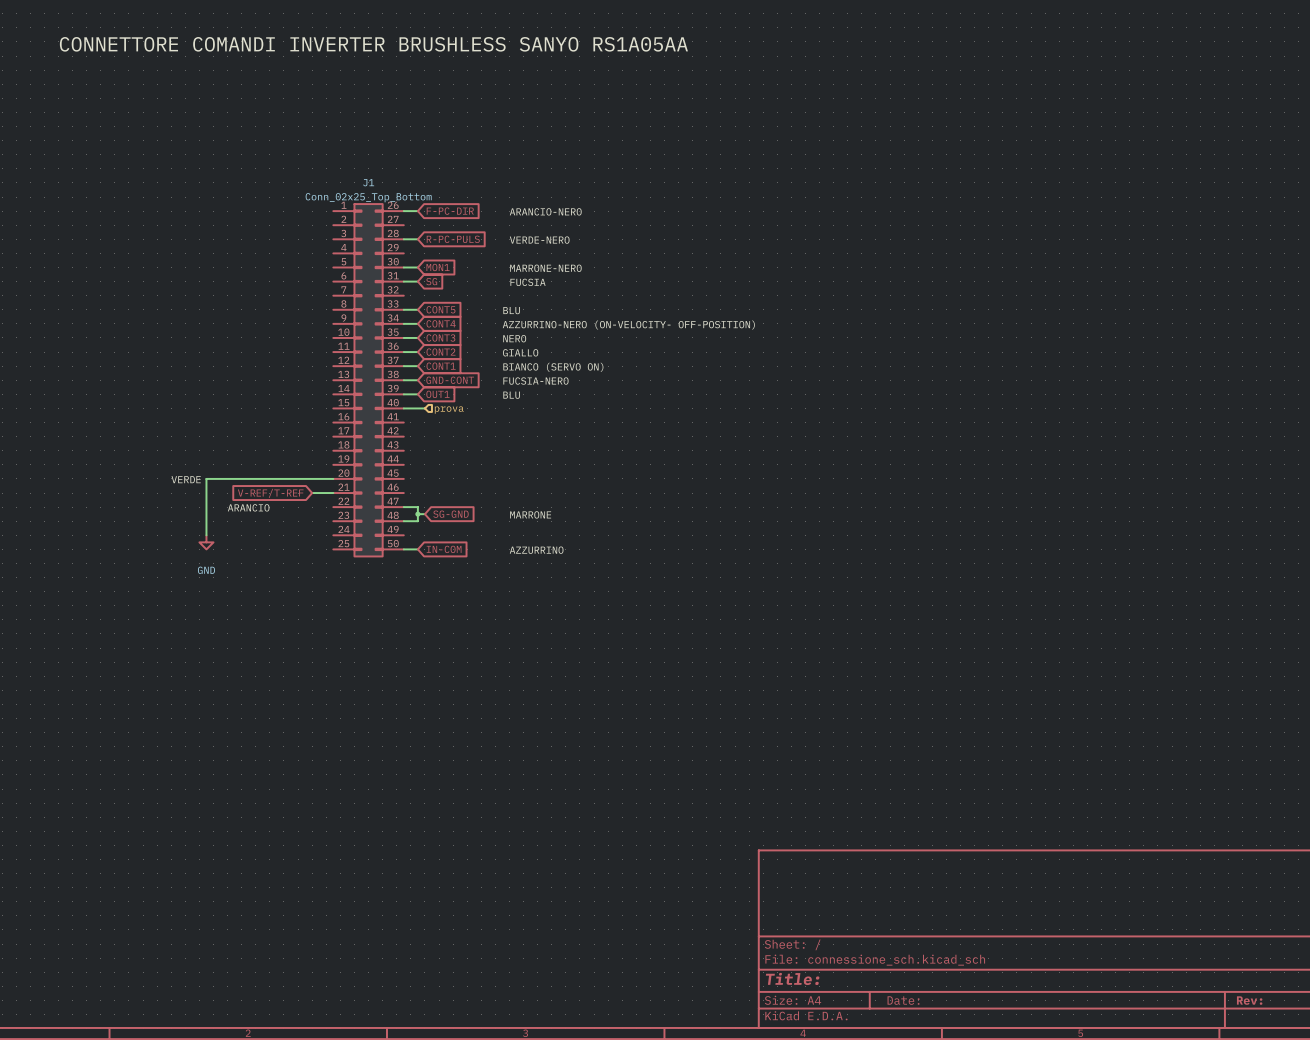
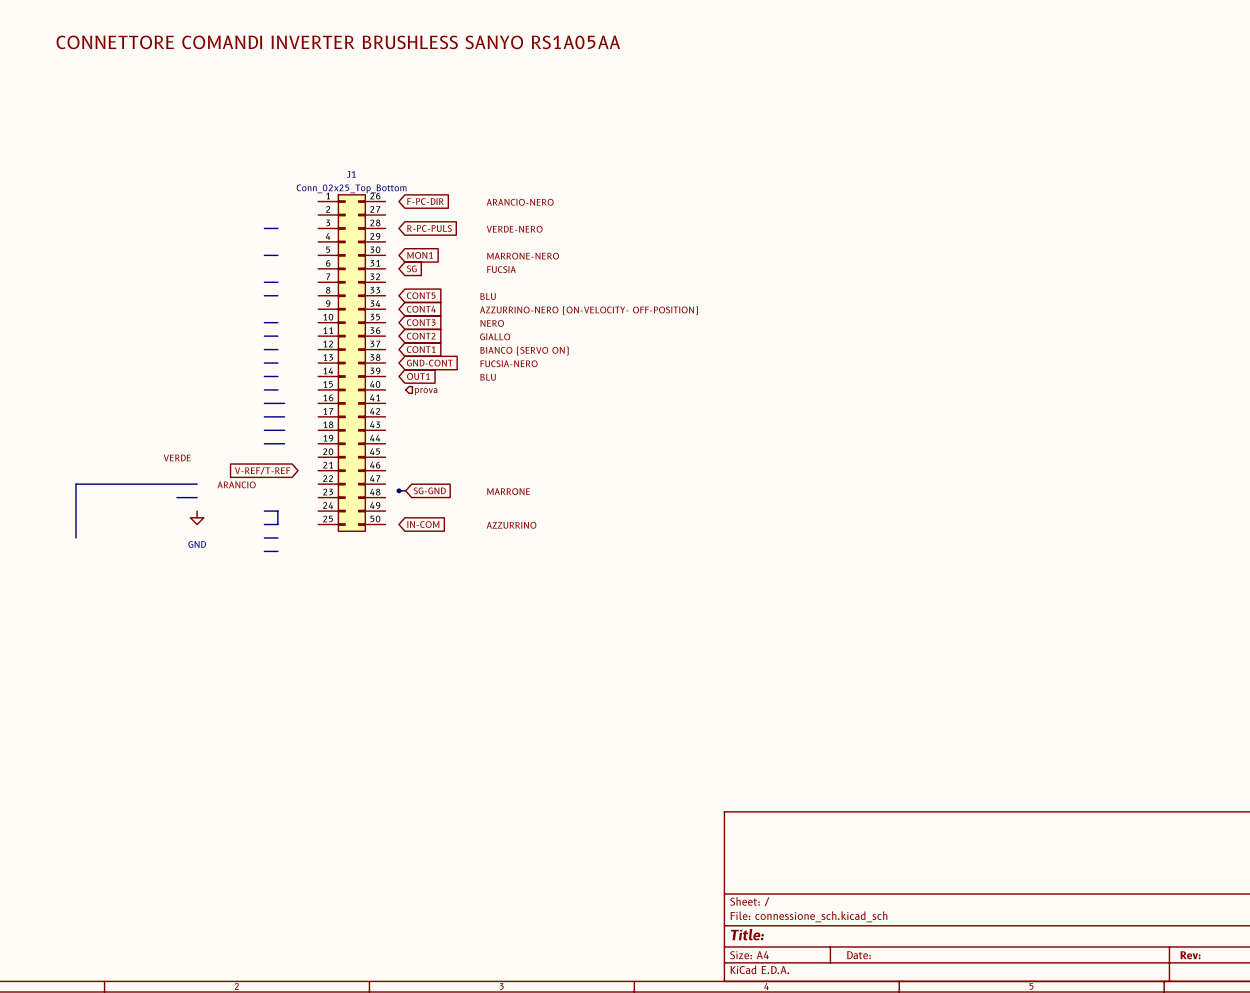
wire: (403, 211) (417, 211) -> (264, 228) (277, 228)
wire: (403, 239) (417, 239) -> (264, 255) (277, 255)
wire: (403, 267) (417, 267) -> (264, 282) (277, 282)
wire: (403, 281) (417, 281) -> (264, 295) (277, 295)
wire: (403, 309) (417, 309) -> (264, 322) (277, 322)
wire: (403, 323) (417, 323) -> (264, 336) (277, 336)
wire: (403, 337) (417, 337) -> (264, 349) (277, 349)
wire: (403, 352) (417, 352) -> (264, 363) (277, 363)
wire: (403, 366) (417, 366) -> (264, 376) (277, 376)
wire: (403, 380) (417, 380) -> (264, 389) (277, 389)
wire: (403, 394) (417, 394) -> none
wire: (403, 408) (424, 408) -> (264, 416) (284, 416)
wire: none -> (264, 403) (284, 403)
wire: none -> (264, 430) (284, 430)
wire: none -> (264, 443) (284, 443)
wire: (333, 478) (206, 478) (206, 535) -> (197, 484) (76, 484) (76, 537)
wire: (312, 493) (333, 493) -> (176, 497) (197, 497)
wire: (403, 507) (417, 507) (417, 521) (403, 521) -> (264, 511) (277, 511) (277, 524) (264, 524)
wire: (403, 549) (417, 549) -> (264, 551) (277, 551)
wire: none -> (264, 537) (277, 537)

